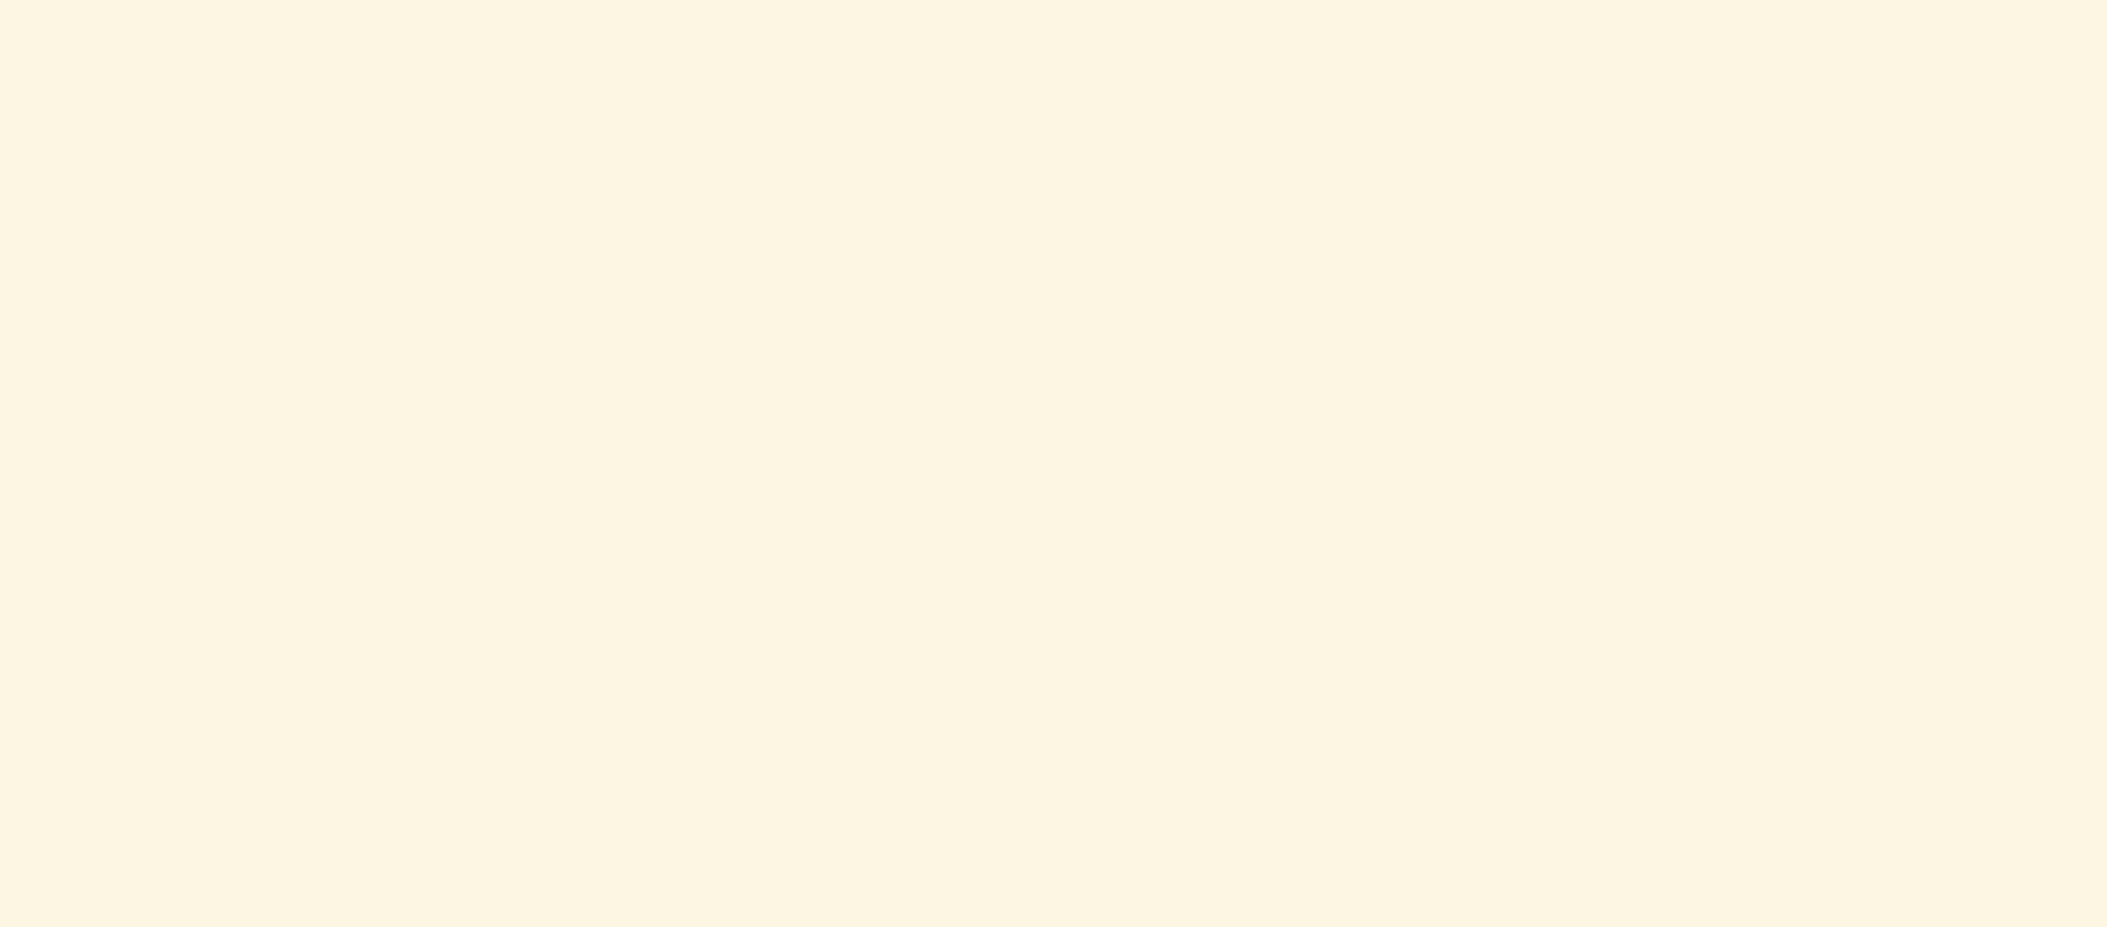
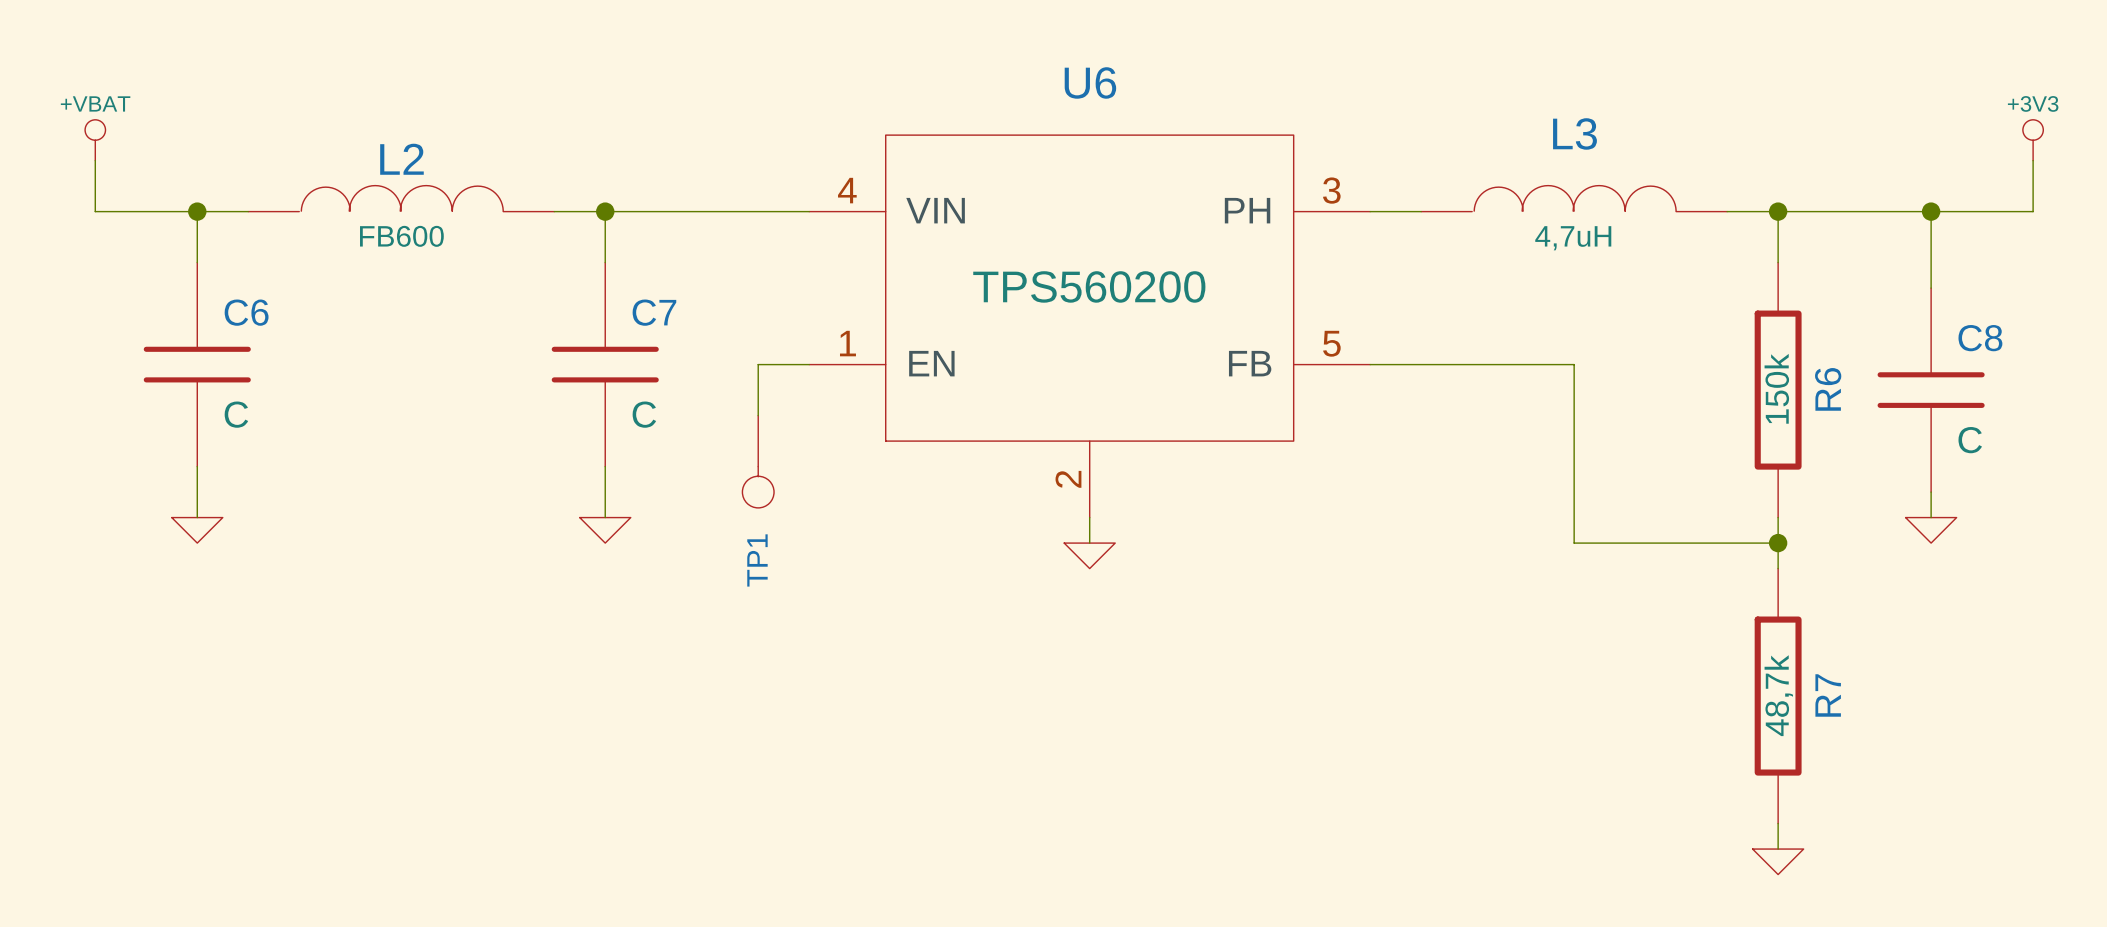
power symbol: none -> +VBAT (95, 140)
power symbol: none -> +3V3 (2033, 140)
wire: none -> (95, 160) (95, 211) (248, 211)
wire: none -> (2033, 160) (2033, 211) (1727, 211)
L2: none -> FB600 (401, 198)
L3: none -> 4,7uH (1574, 198)
wire: none -> (197, 211) (197, 262)
junction: none -> (197, 211)
wire: none -> (554, 211) (809, 211)
wire: none -> (605, 211) (605, 262)
junction: none -> (605, 211)
wire: none -> (1370, 211) (1421, 211)
wire: none -> (1778, 211) (1778, 262)
junction: none -> (1778, 211)
wire: none -> (1931, 211) (1931, 288)
junction: none -> (1931, 211)
U6: none -> TPS560200 (1089, 326)
C6: none -> C (197, 364)
C7: none -> C (605, 364)
wire: none -> (809, 364) (758, 364) (758, 415)
wire: none -> (1370, 364) (1574, 364) (1574, 543) (1778, 543)
R6: none -> 150k (1778, 390)
C8: none -> C (1931, 390)
TP1: none -> (758, 461)
wire: none -> (197, 466) (197, 517)
wire: none -> (605, 466) (605, 517)
wire: none -> (1931, 492) (1931, 517)
wire: none -> (1089, 517) (1089, 543)
wire: none -> (1778, 517) (1778, 568)
power symbol: none -> (197, 530)
power symbol: none -> (605, 530)
power symbol: none -> (1931, 530)
junction: none -> (1778, 543)
power symbol: none -> (1089, 555)
R7: none -> 48,7k (1778, 696)
wire: none -> (1778, 823) (1778, 849)
power symbol: none -> (1778, 861)

